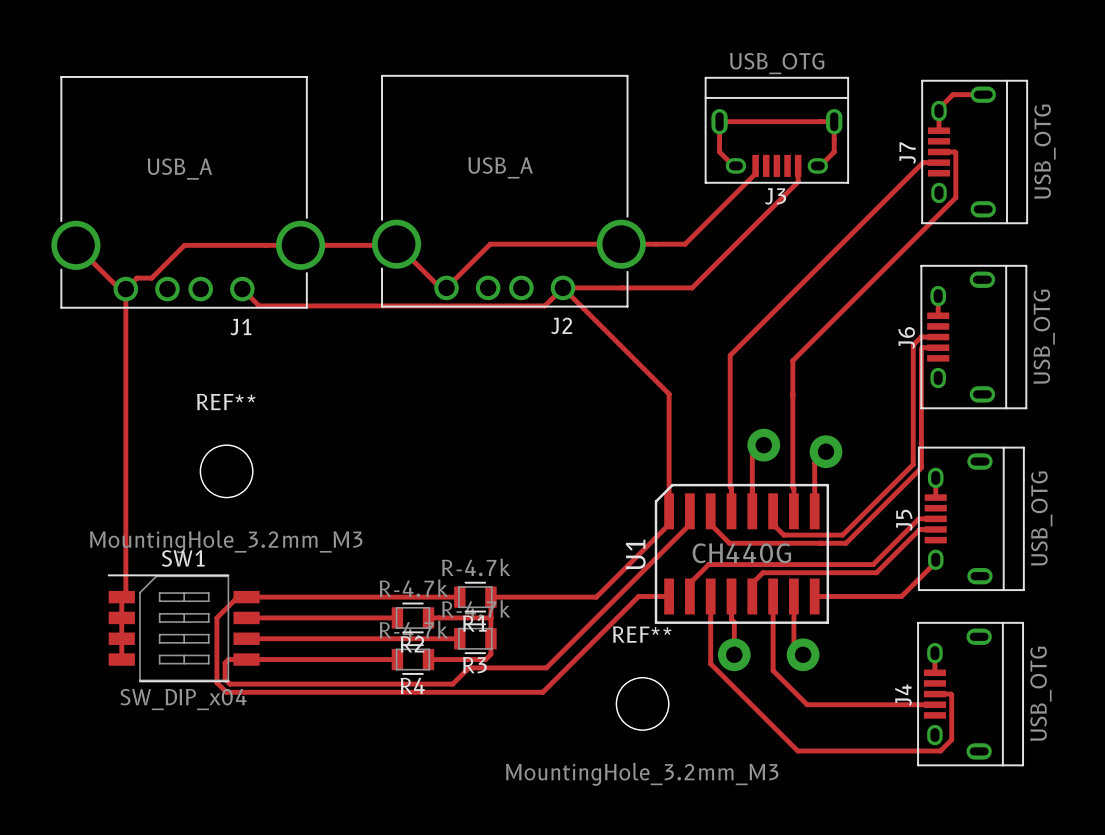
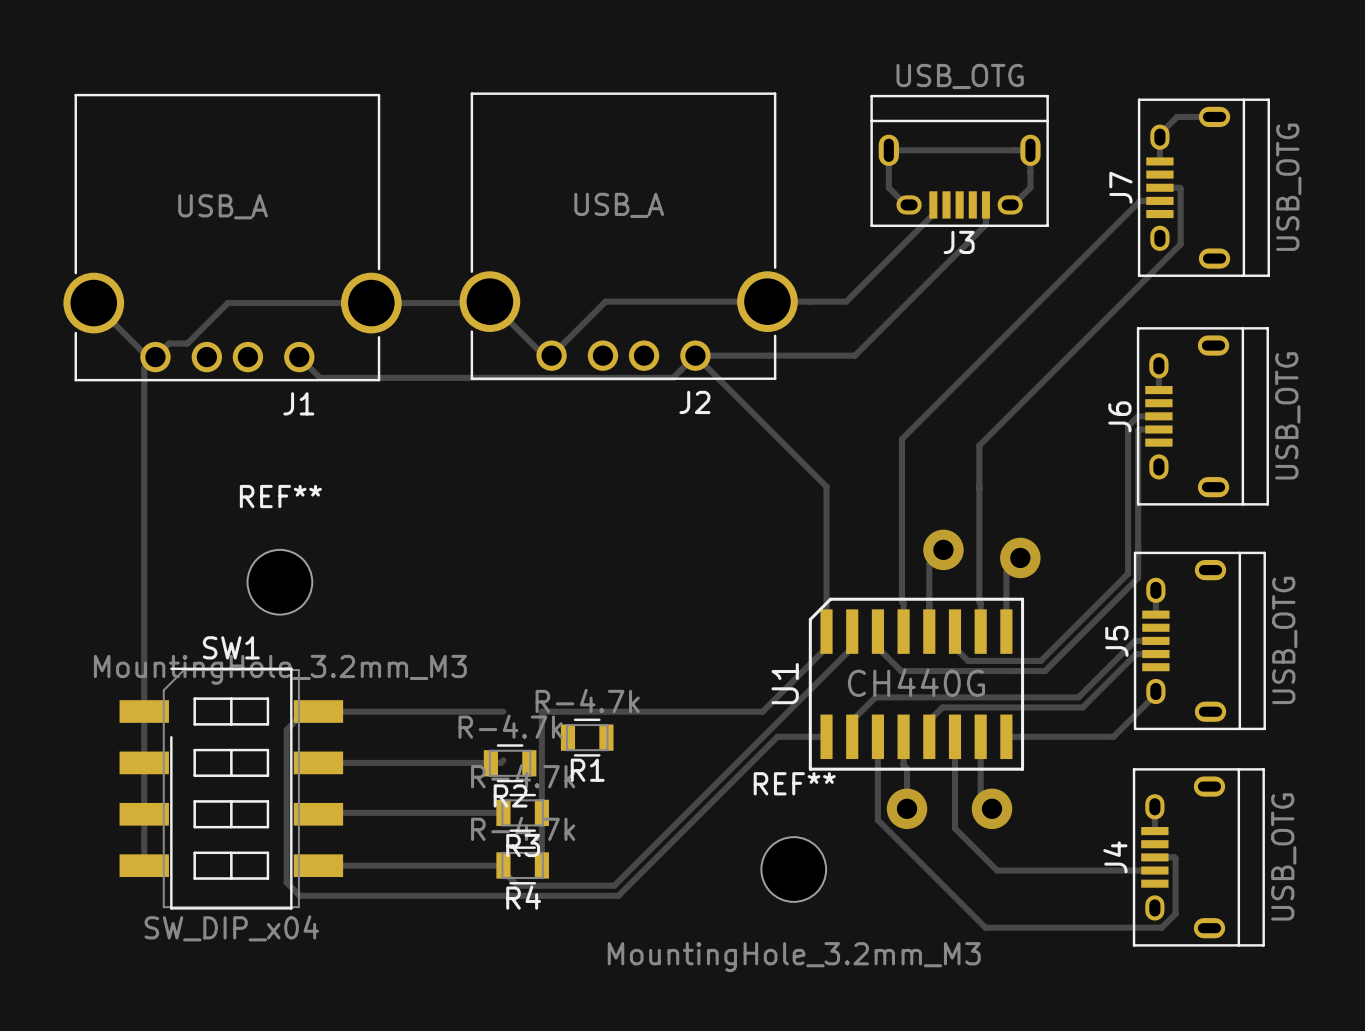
track: (125, 289) (125, 593) (121, 597) (121, 659) -> (155, 357) (144, 368) (144, 865)
SW1 name position: SW1 (183, 558) -> SW1 (231, 647)
SW1 footprint: [107, 574, 260, 683] -> [119, 667, 344, 910]
track: none -> (318, 711) (503, 711)
track: (617, 576) (596, 597) (490, 597) (490, 654) (485, 659) (428, 659) -> (762, 711) (541, 711) (541, 865)
track: (638, 596) (542, 692) (226, 692) (216, 682) (216, 617) (237, 597) (459, 597) -> (788, 736) (777, 736) (618, 895) (299, 895) (286, 882) (286, 729) (305, 711) (318, 711)
track: none -> (503, 760) (500, 762) (318, 762)
track: (246, 617) (397, 617) -> none
track: (428, 617) (490, 617) -> none
track: (246, 638) (459, 638) -> none
R3 position: (475, 638) -> (522, 812)
track: none -> (503, 812) (318, 814)
track: (397, 659) (228, 659) (225, 662) (225, 679) (229, 684) (452, 684) (468, 667) (546, 667) -> (503, 865) (503, 871) (517, 885) (614, 885) (675, 825)
R4 position: (412, 659) -> (522, 865)
SW1 value position: SW_DIP_x04 (183, 699) -> SW_DIP_x04 (231, 928)
track: none -> (318, 865) (503, 865)

